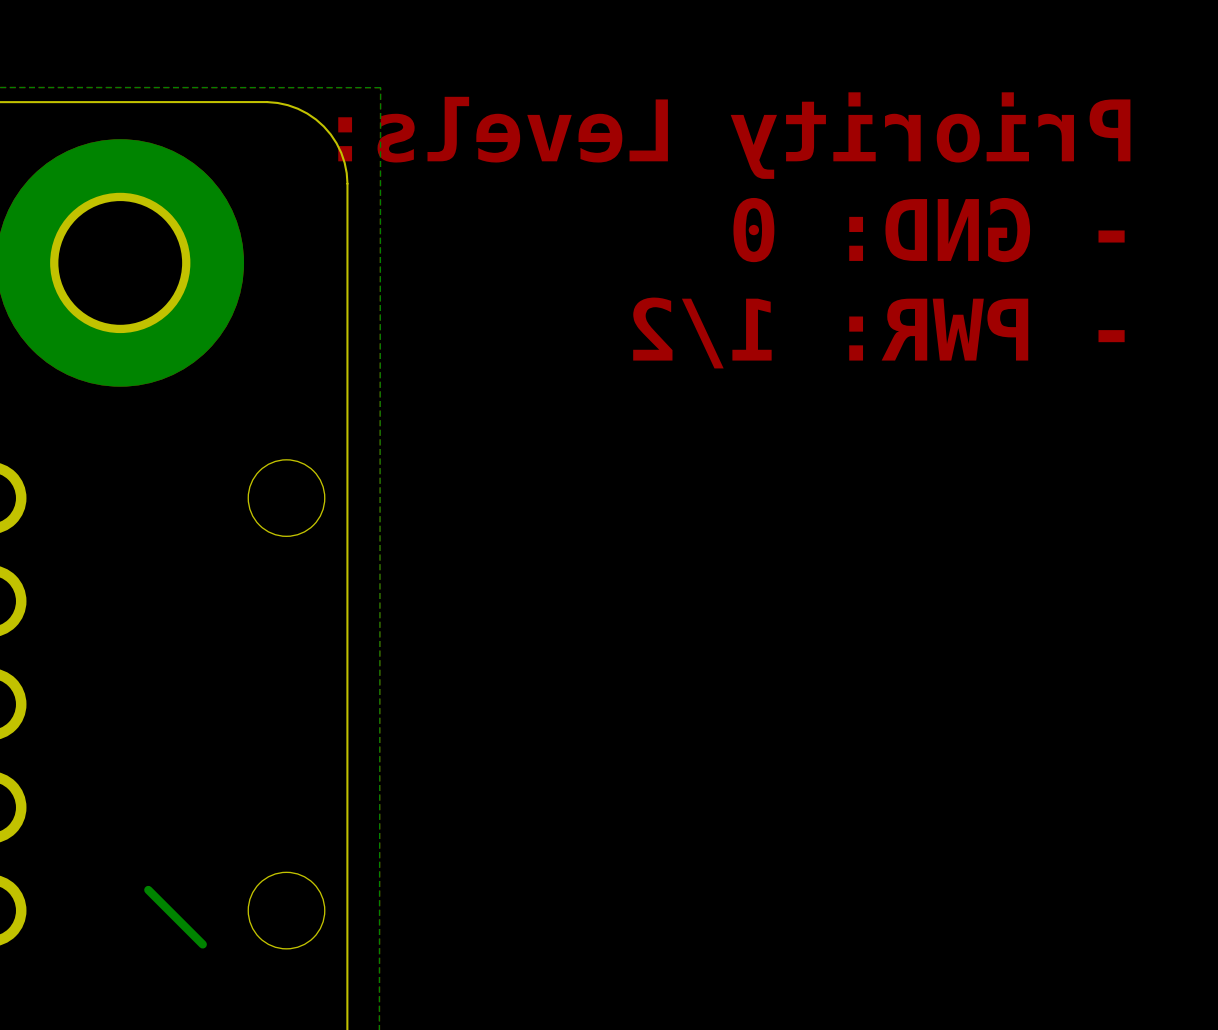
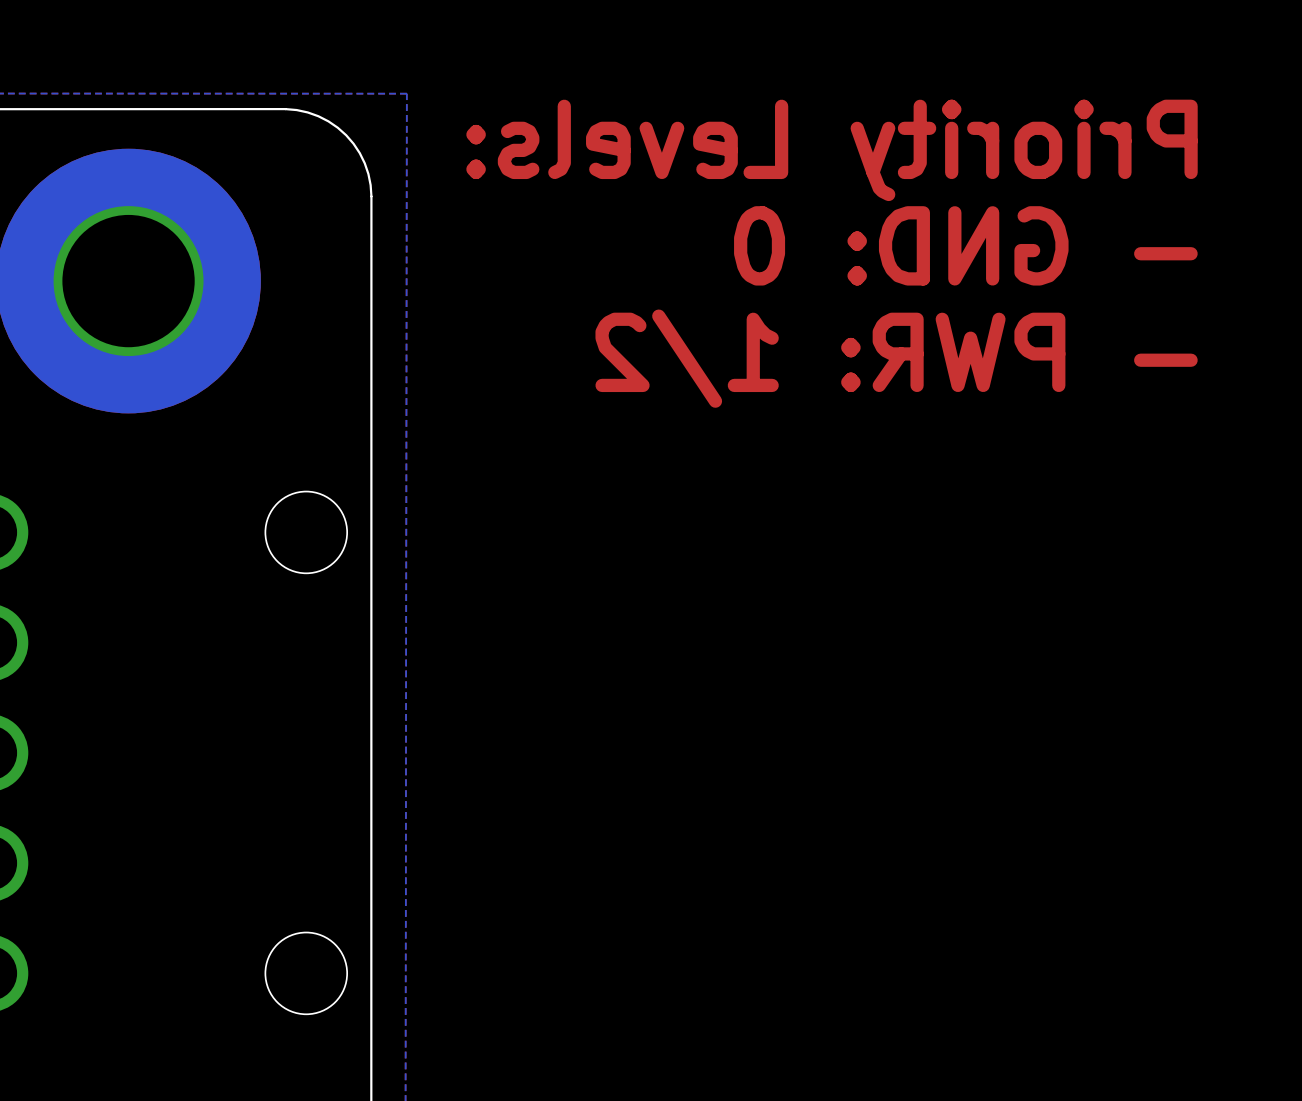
bottom track: (148, 889) (202, 944) -> none

